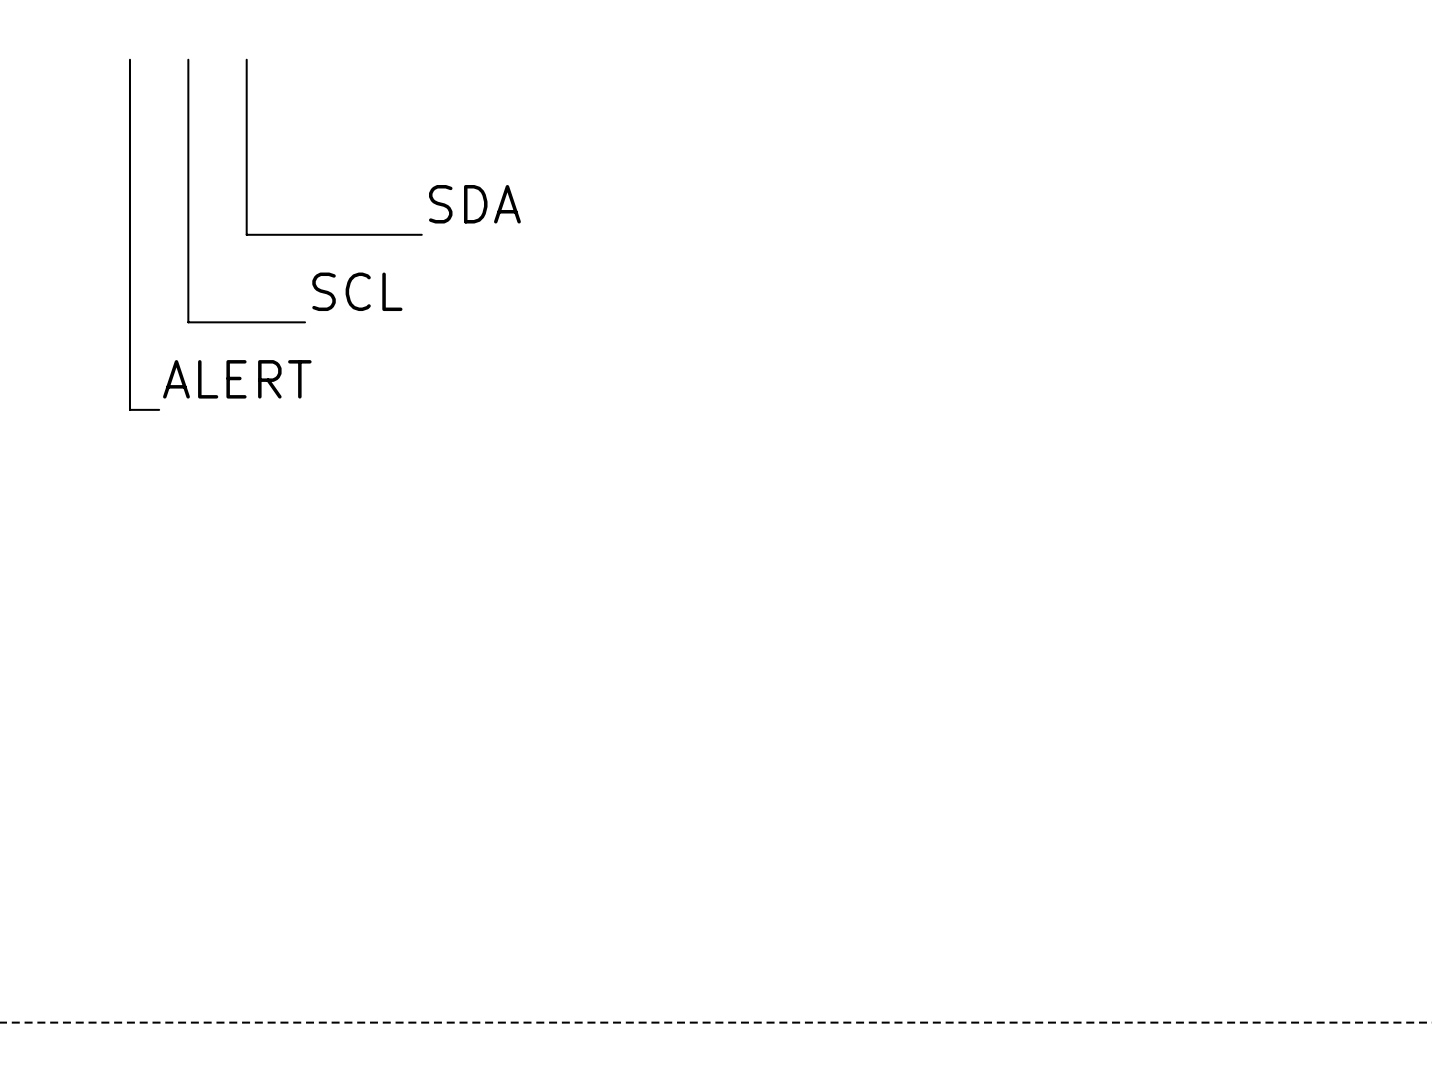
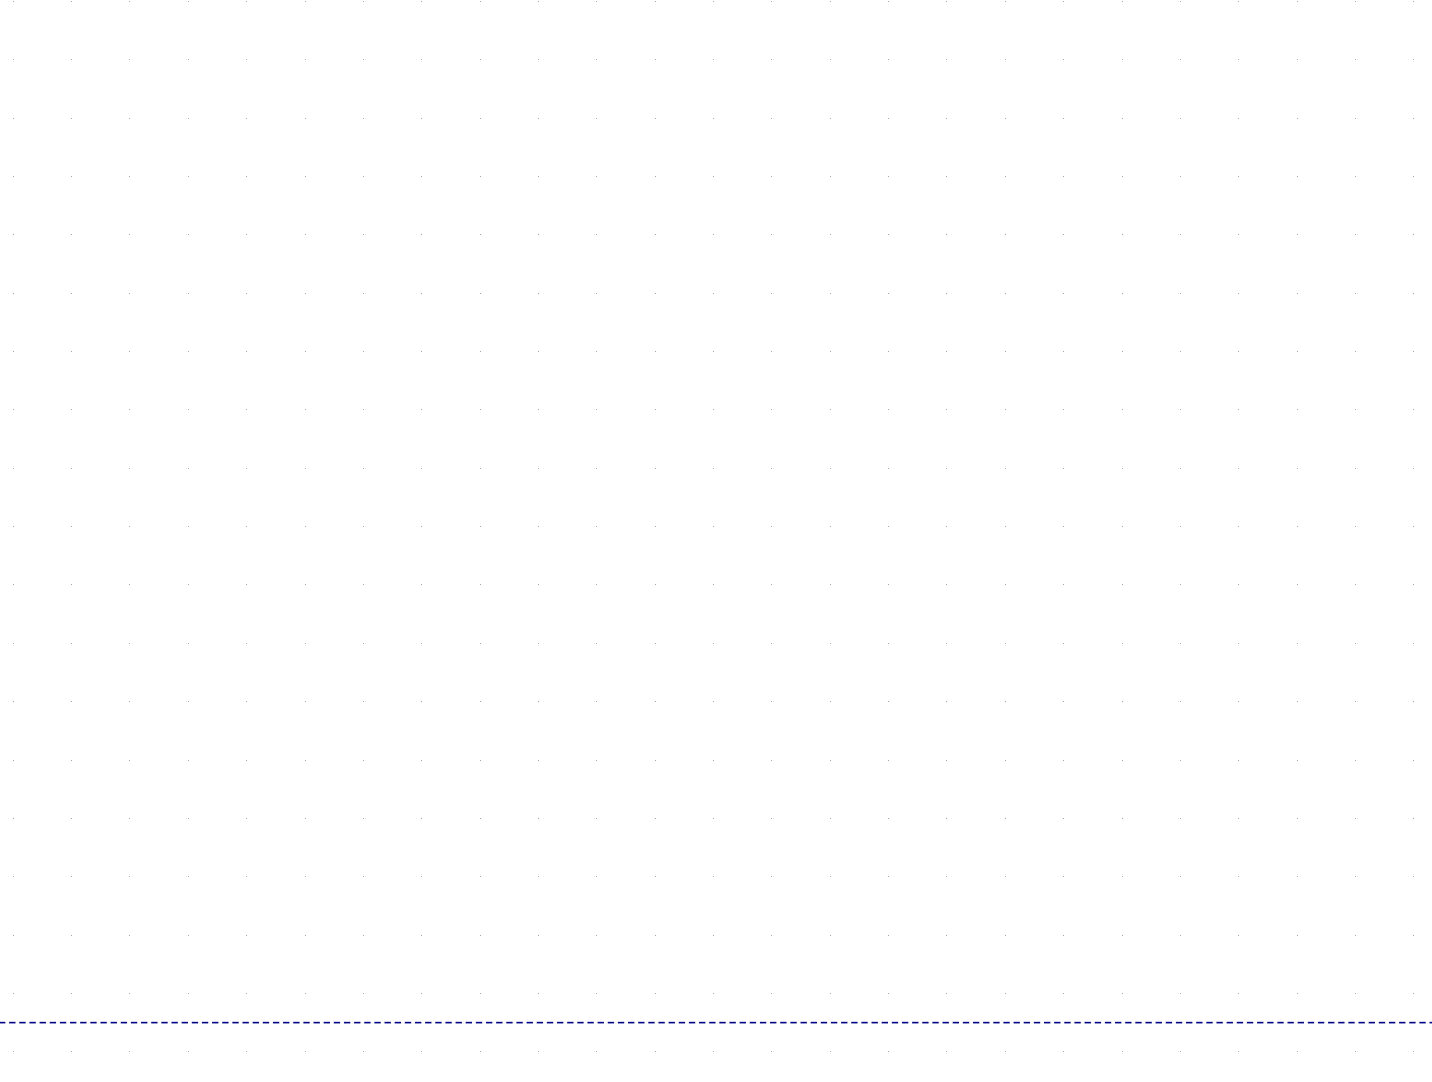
wire: (129, 59) (129, 409) (159, 409) -> none
wire: (188, 59) (188, 322) (305, 322) -> none
wire: (246, 59) (246, 234) (421, 234) -> none
label: SDA (474, 204) -> none
label: SCL (357, 291) -> none
label: ALERT (237, 379) -> none

